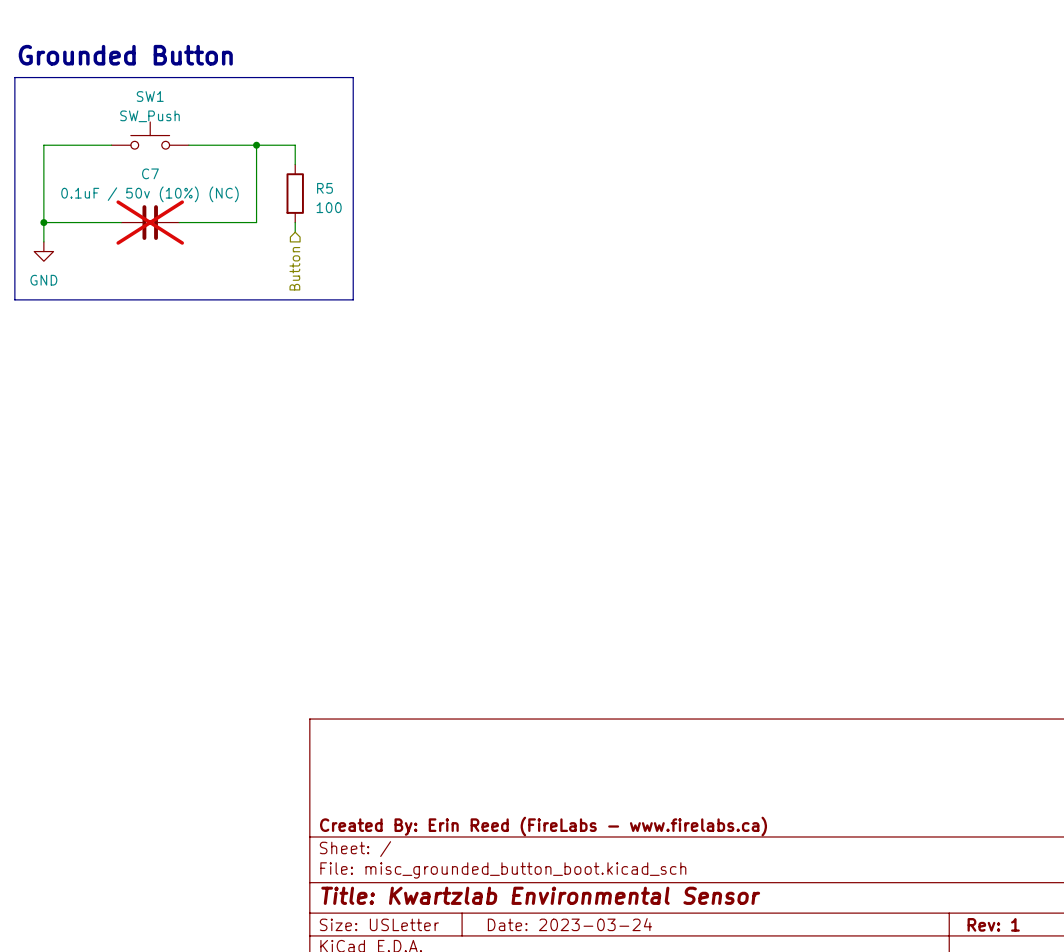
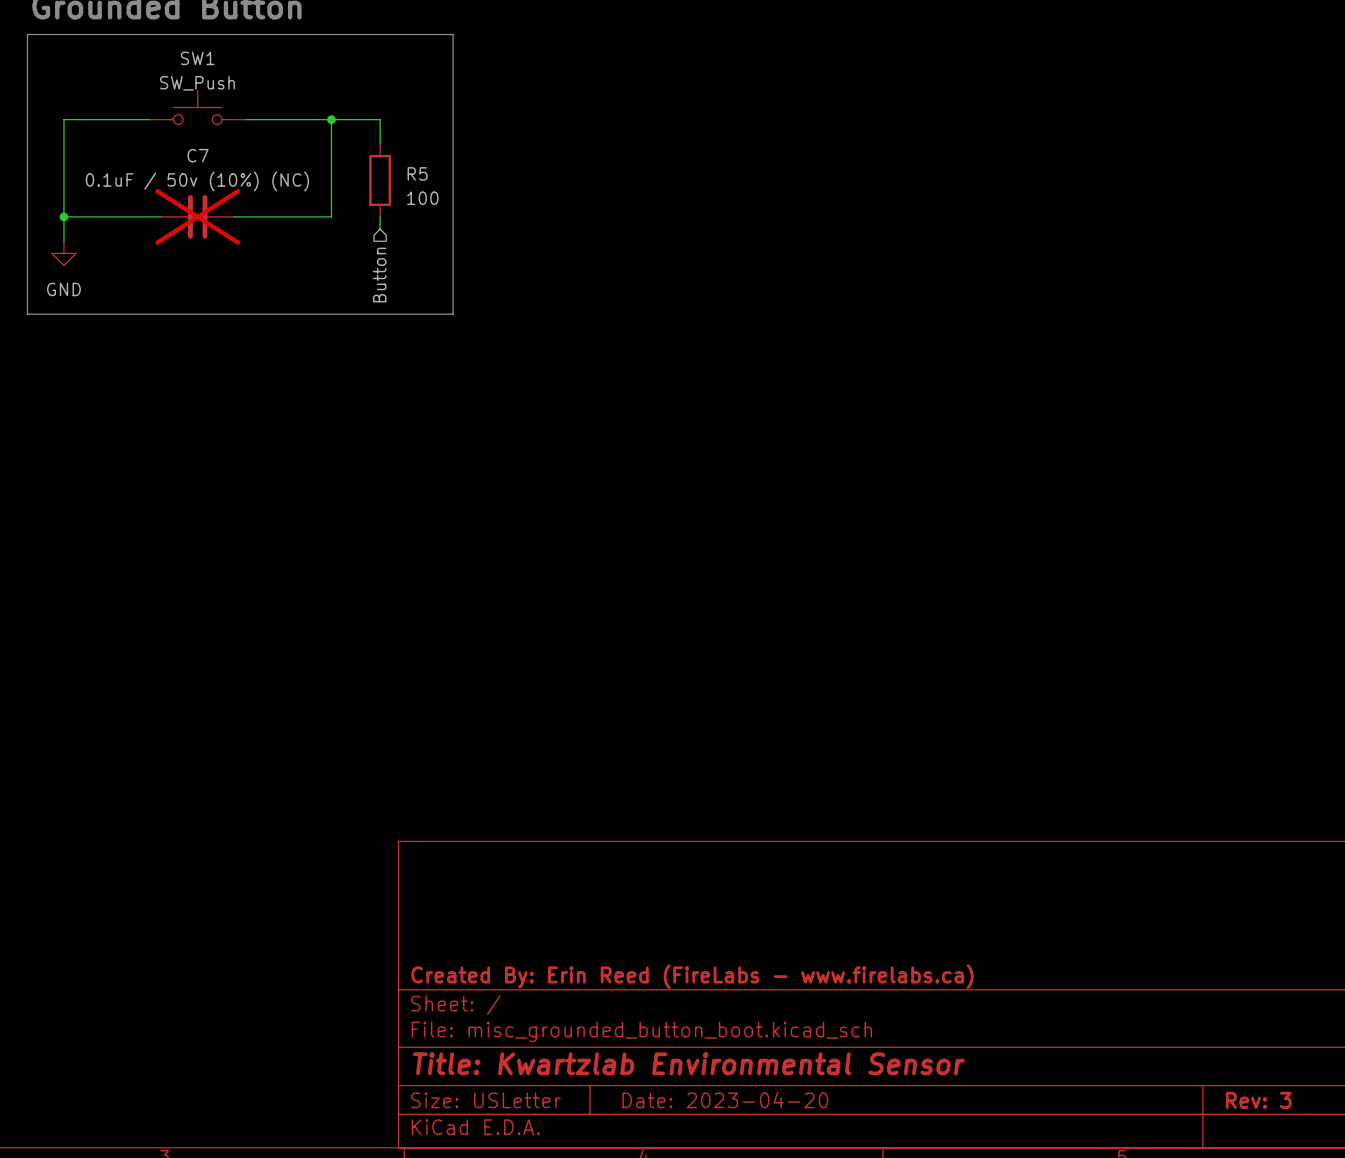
title block: Date: 2023-03-24 (569, 924) -> Date: 2023-04-20 (725, 1100)
title block: Rev: 1 (993, 924) -> Rev: 3 (1258, 1100)

